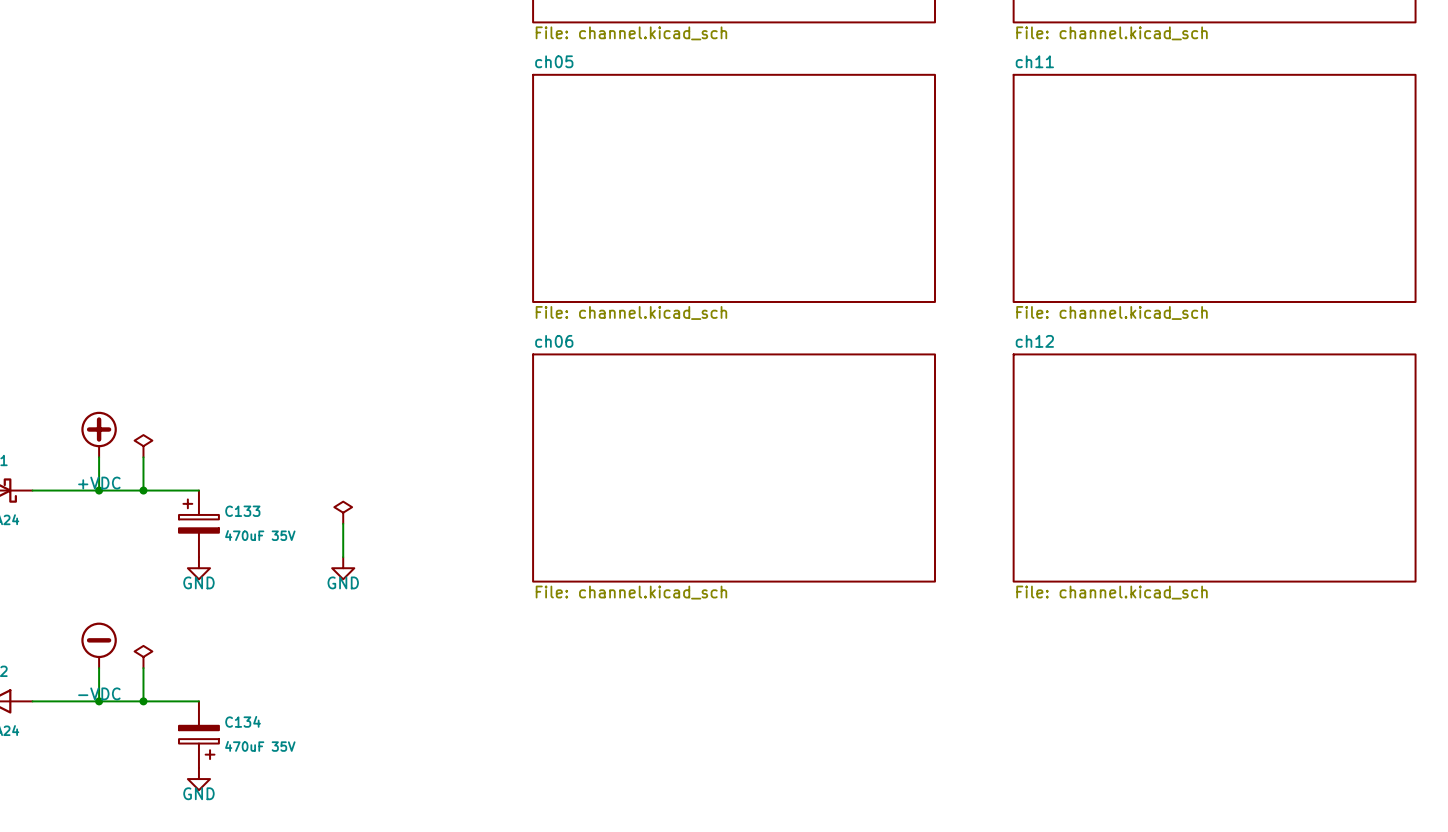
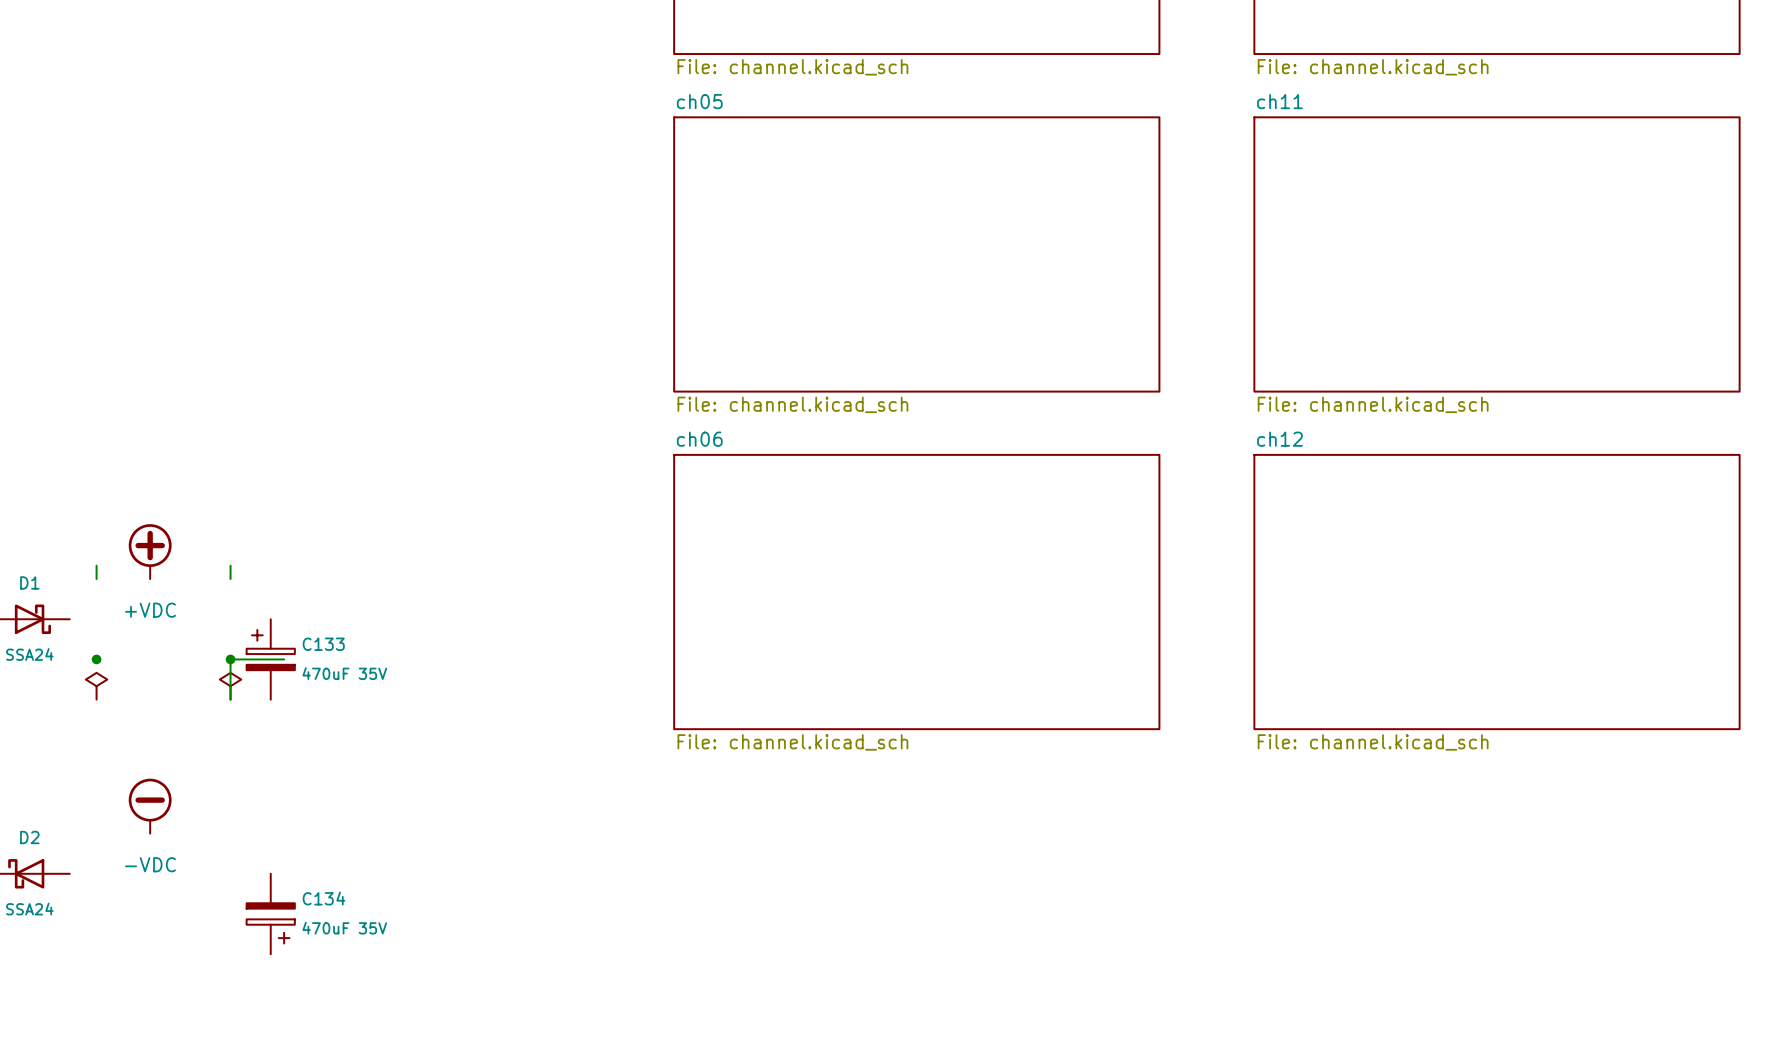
wire: none -> (96, 565) (96, 579)
power symbol: (143, 446) -> none
wire: none -> (230, 565) (230, 579)
wire: (99, 457) (99, 490) -> none
wire: (143, 457) (143, 490) -> none
wire: (32, 490) (198, 490) -> none
junction: (99, 490) -> none
junction: (143, 490) -> none
power symbol: (343, 512) -> none
junction: none -> (96, 659)
junction: none -> (230, 659)
wire: none -> (284, 659) (230, 659) (230, 699)
wire: (343, 523) (343, 557) -> none
power symbol: none -> (96, 686)
power symbol: none -> (230, 686)
power symbol: GND (198, 568) -> none
power symbol: GND (343, 568) -> none
power symbol: (143, 656) -> none
wire: (99, 668) (99, 701) -> none
wire: (143, 668) (143, 701) -> none
wire: (32, 701) (198, 701) -> none
junction: (99, 701) -> none
junction: (143, 701) -> none
power symbol: GND (198, 779) -> none

